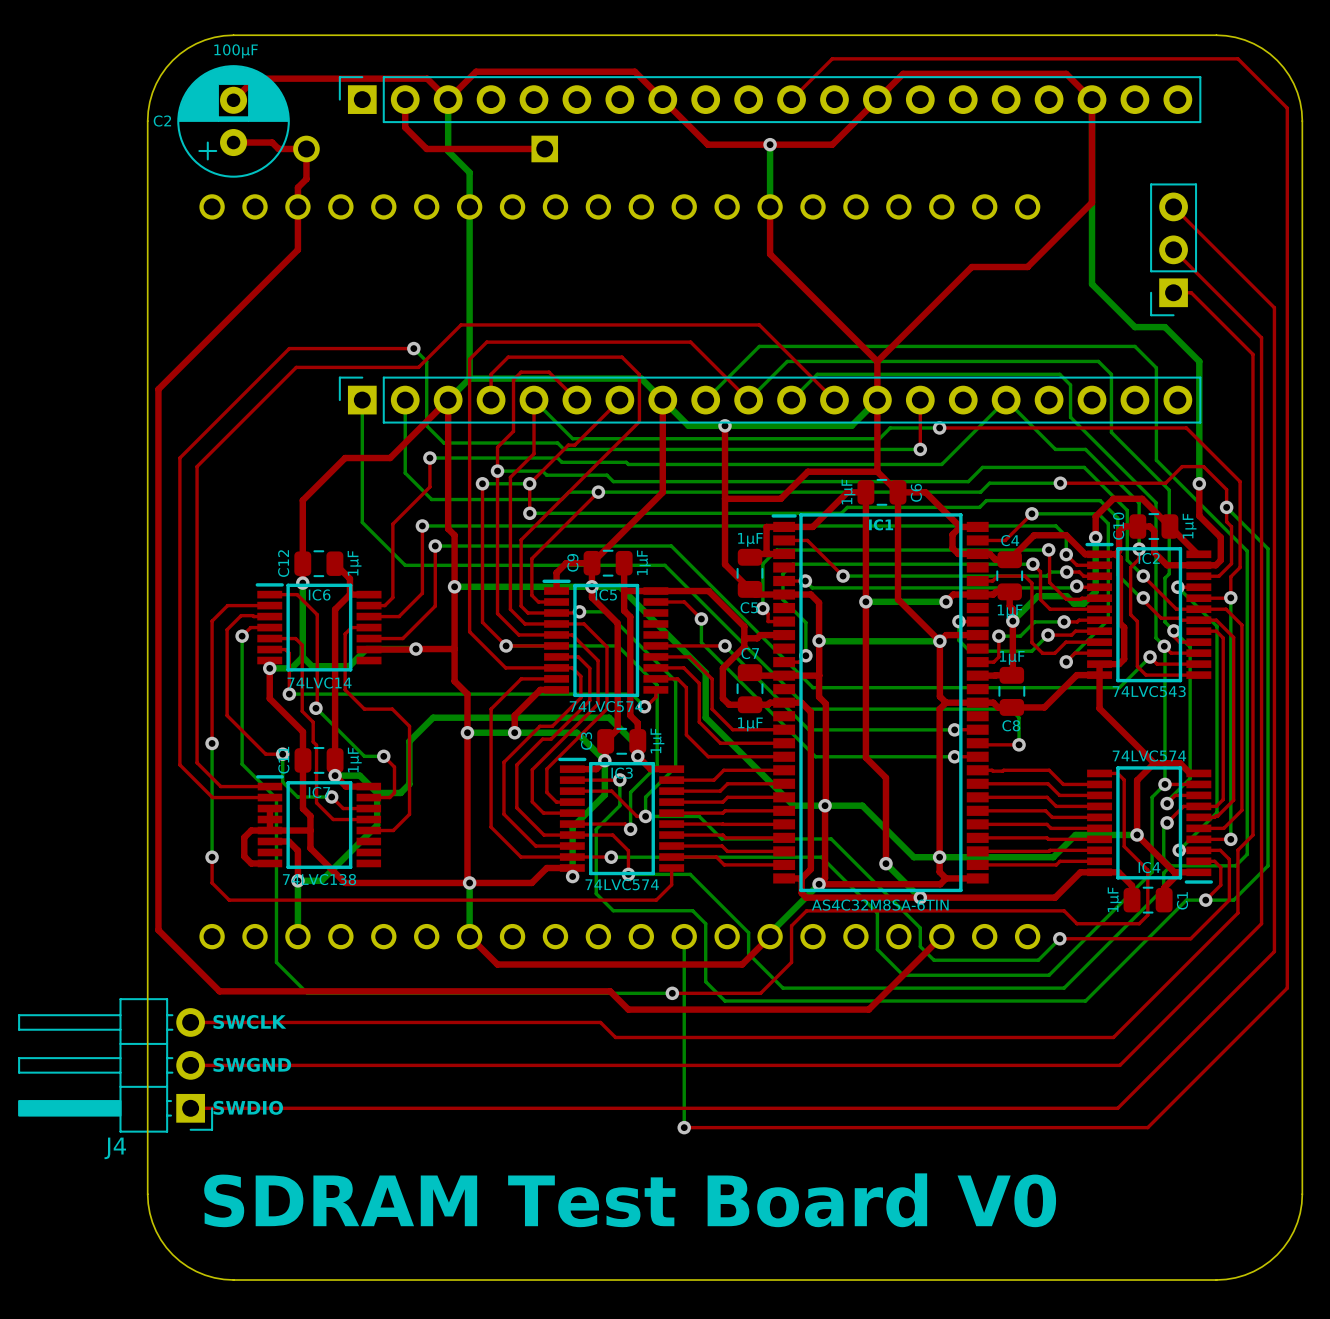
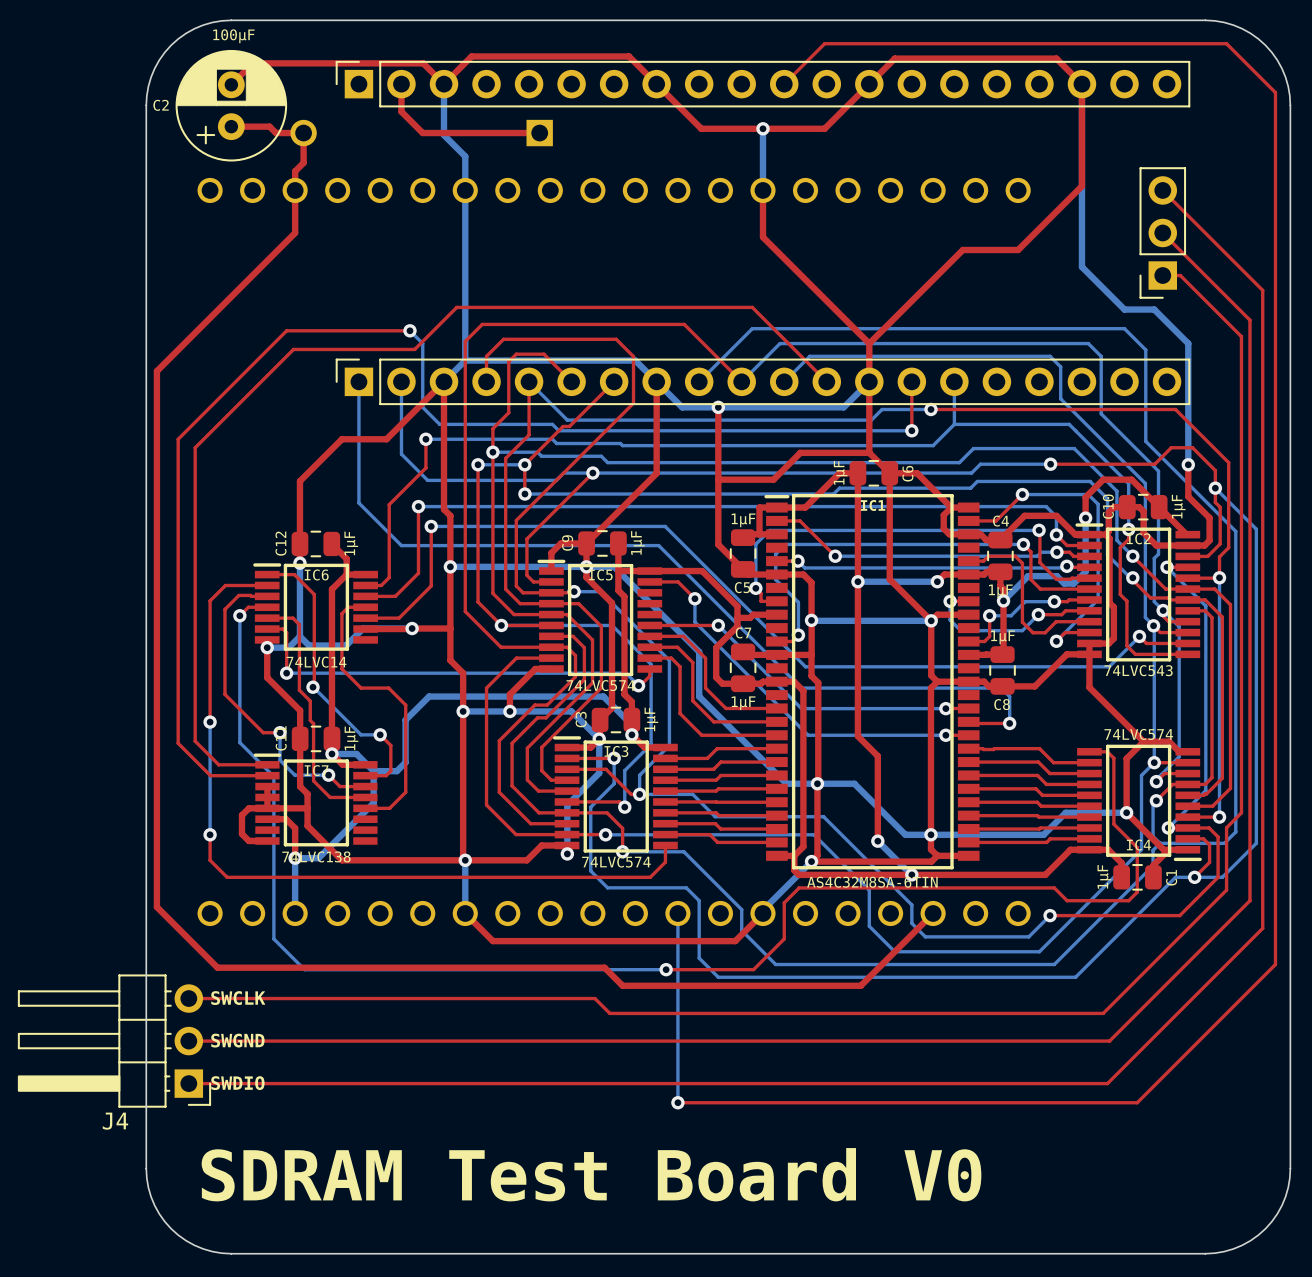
bottom track: (963, 443) (1006, 400) (1055, 449) (1085, 449) -> (954, 381) (954, 424) (1069, 424) (1075, 430)

